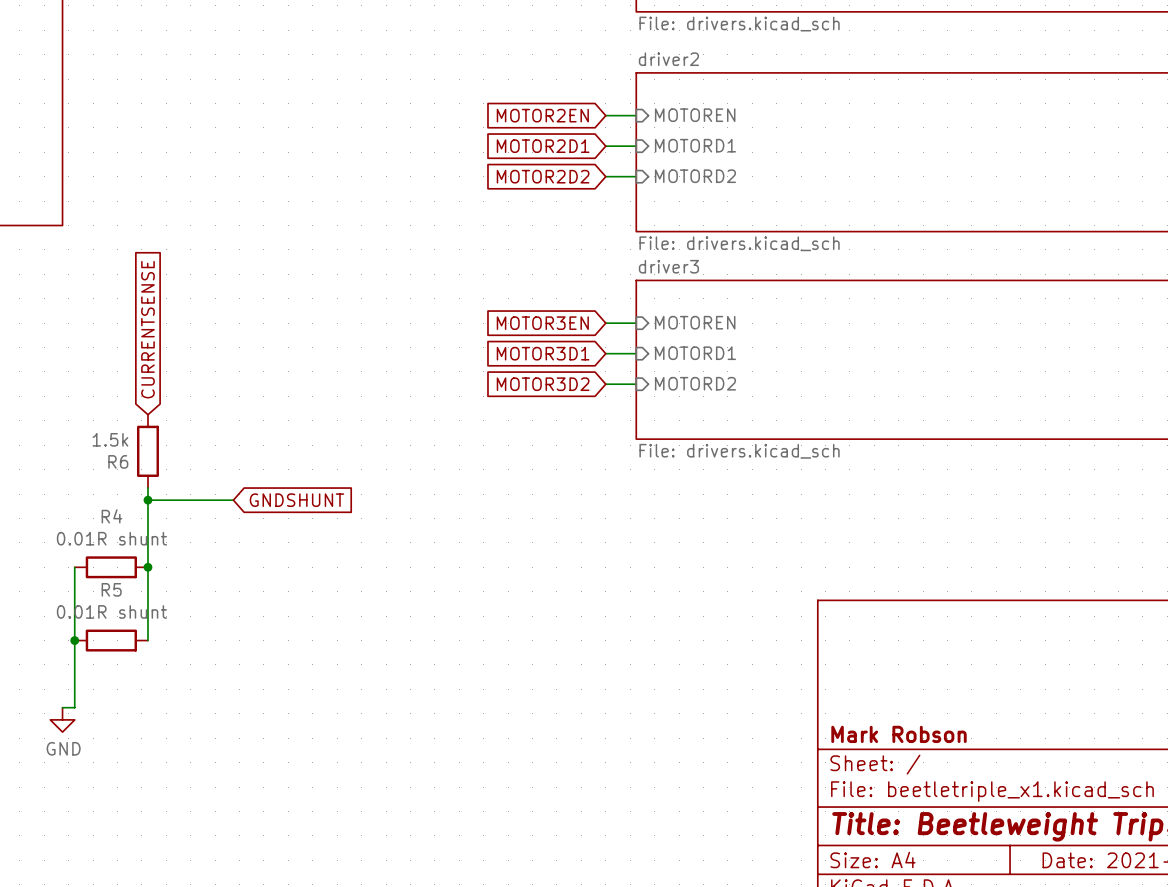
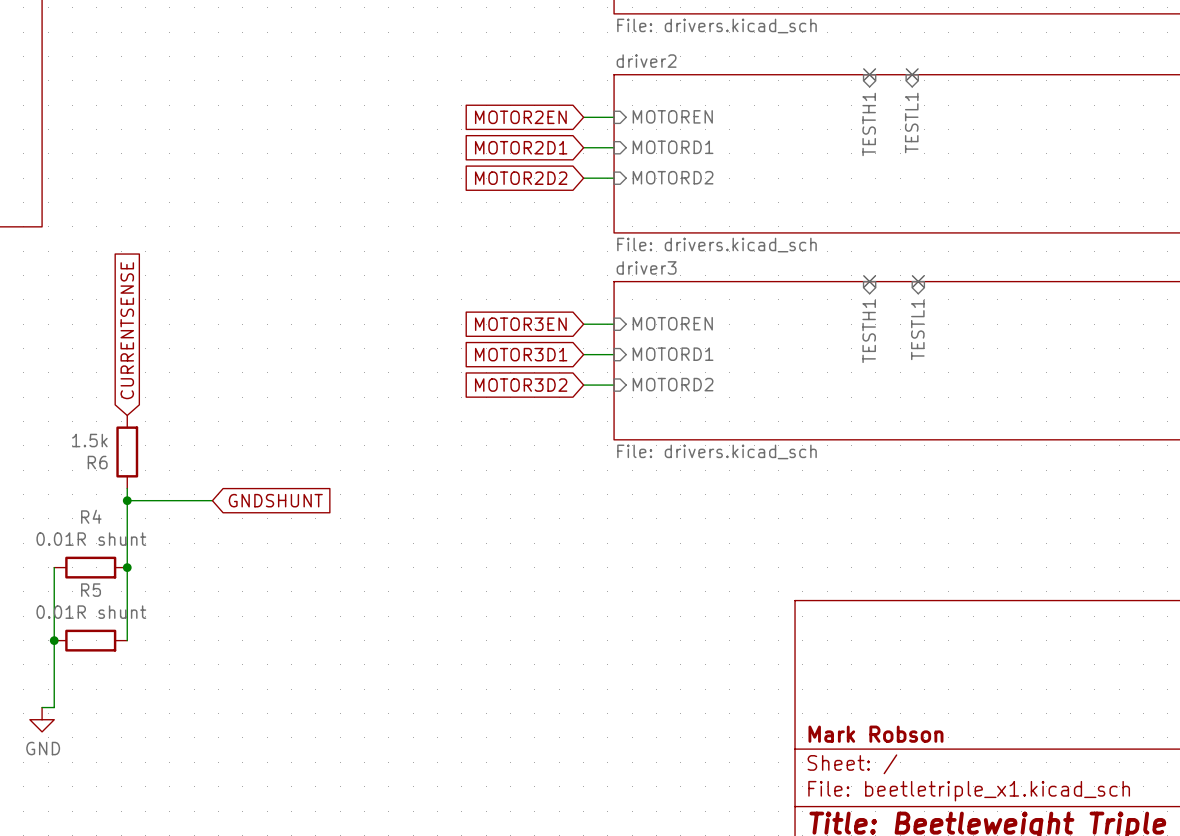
no-connect mark: none -> (869, 74)
no-connect mark: none -> (912, 74)
sheet pin: none -> TESTL1 (911, 123)
sheet pin: none -> TESTH1 (869, 124)
no-connect mark: none -> (869, 281)
no-connect mark: none -> (918, 281)
sheet pin: none -> TESTL1 (917, 329)
sheet pin: none -> TESTH1 (869, 331)

